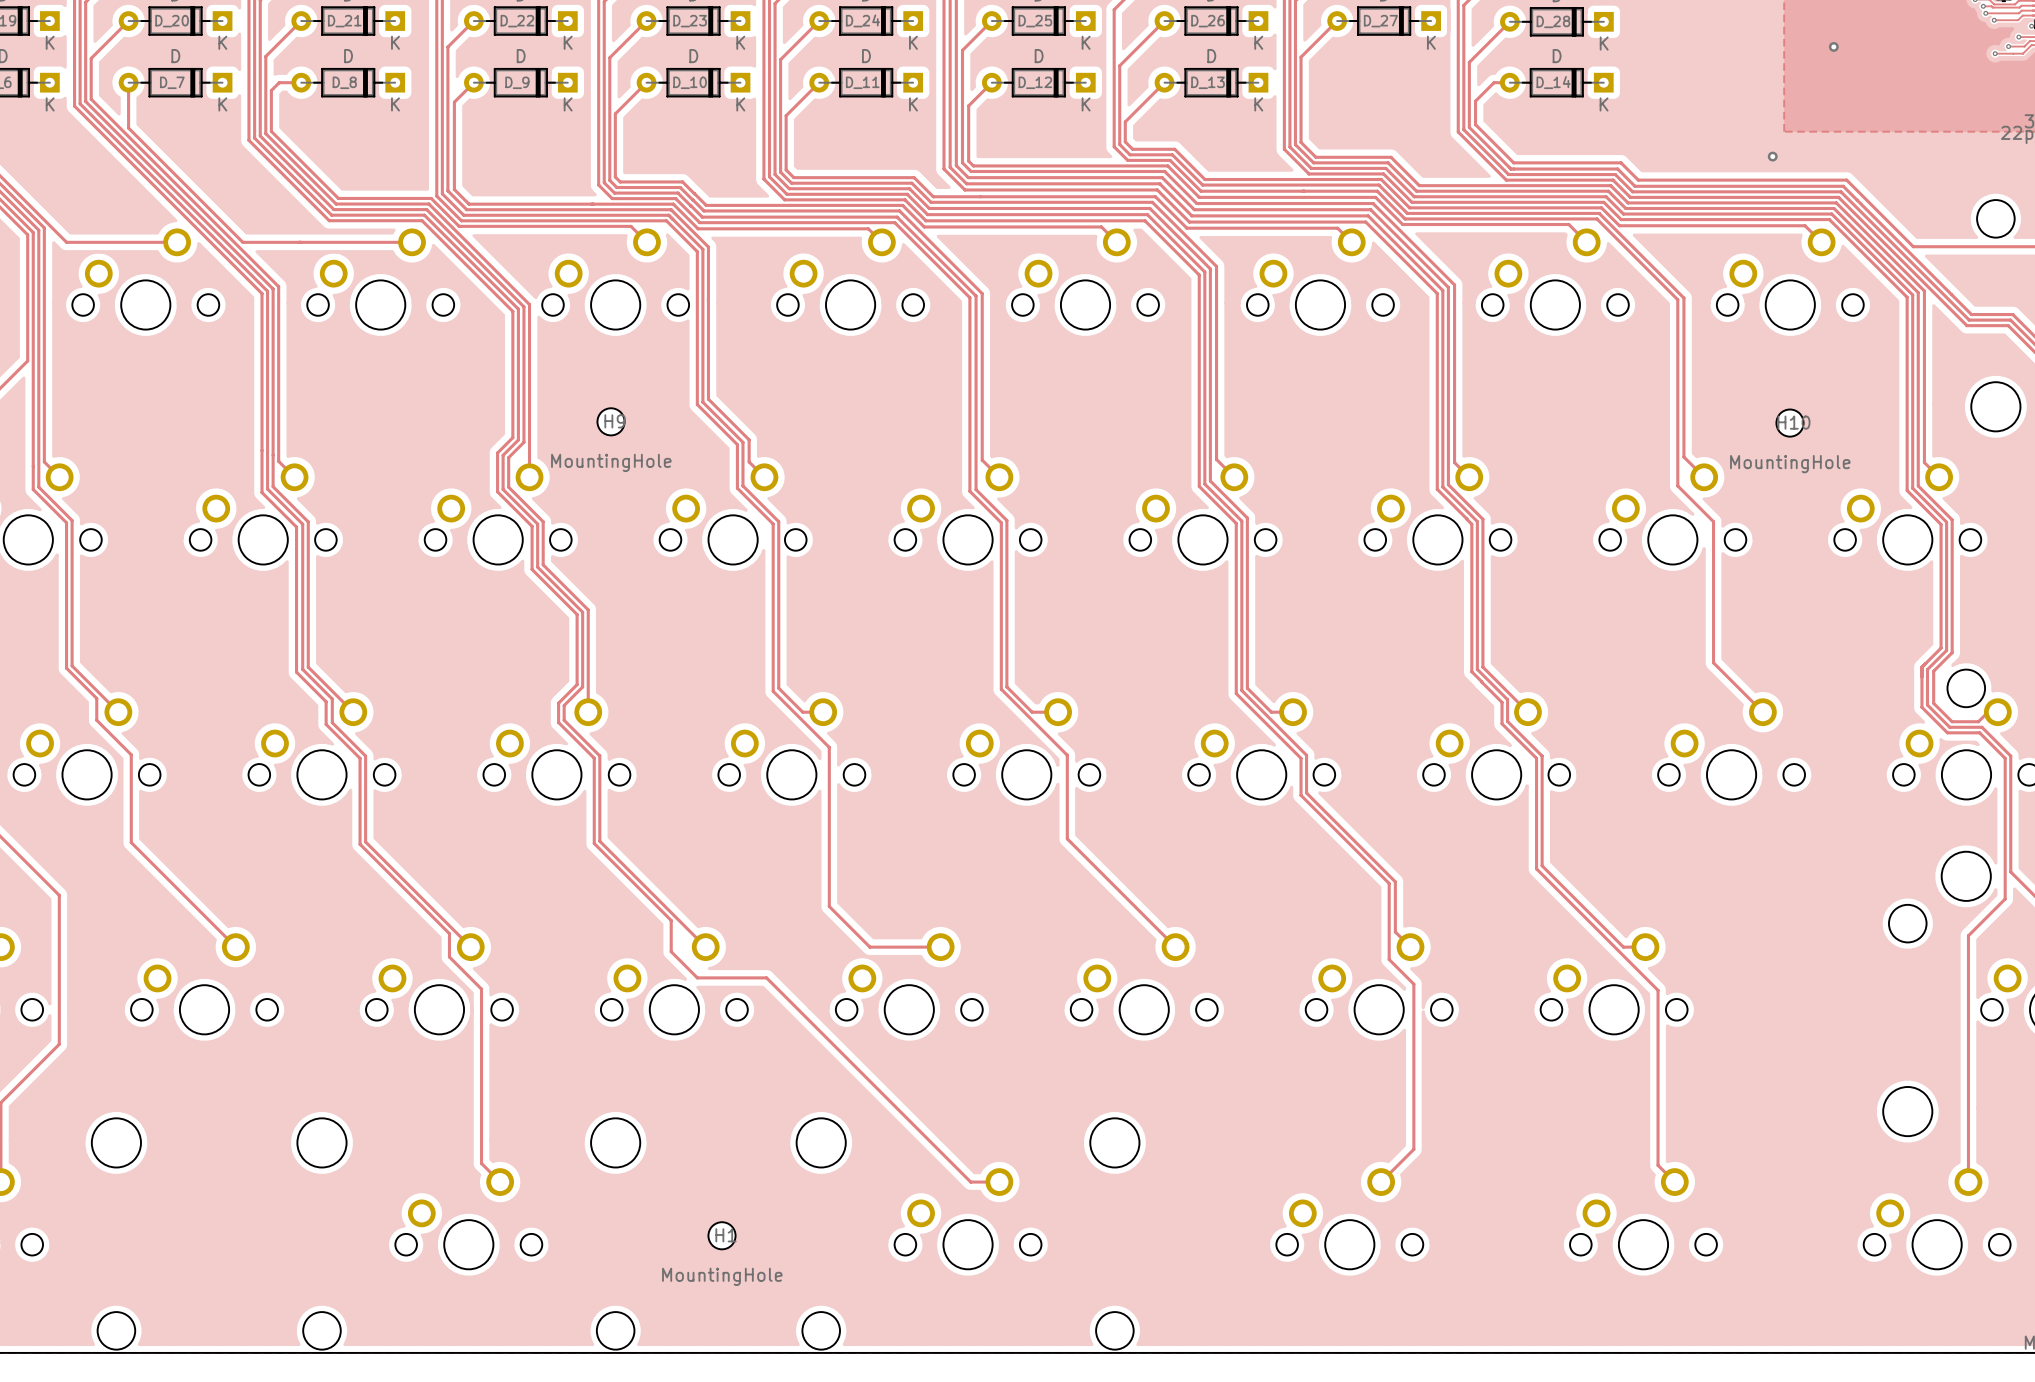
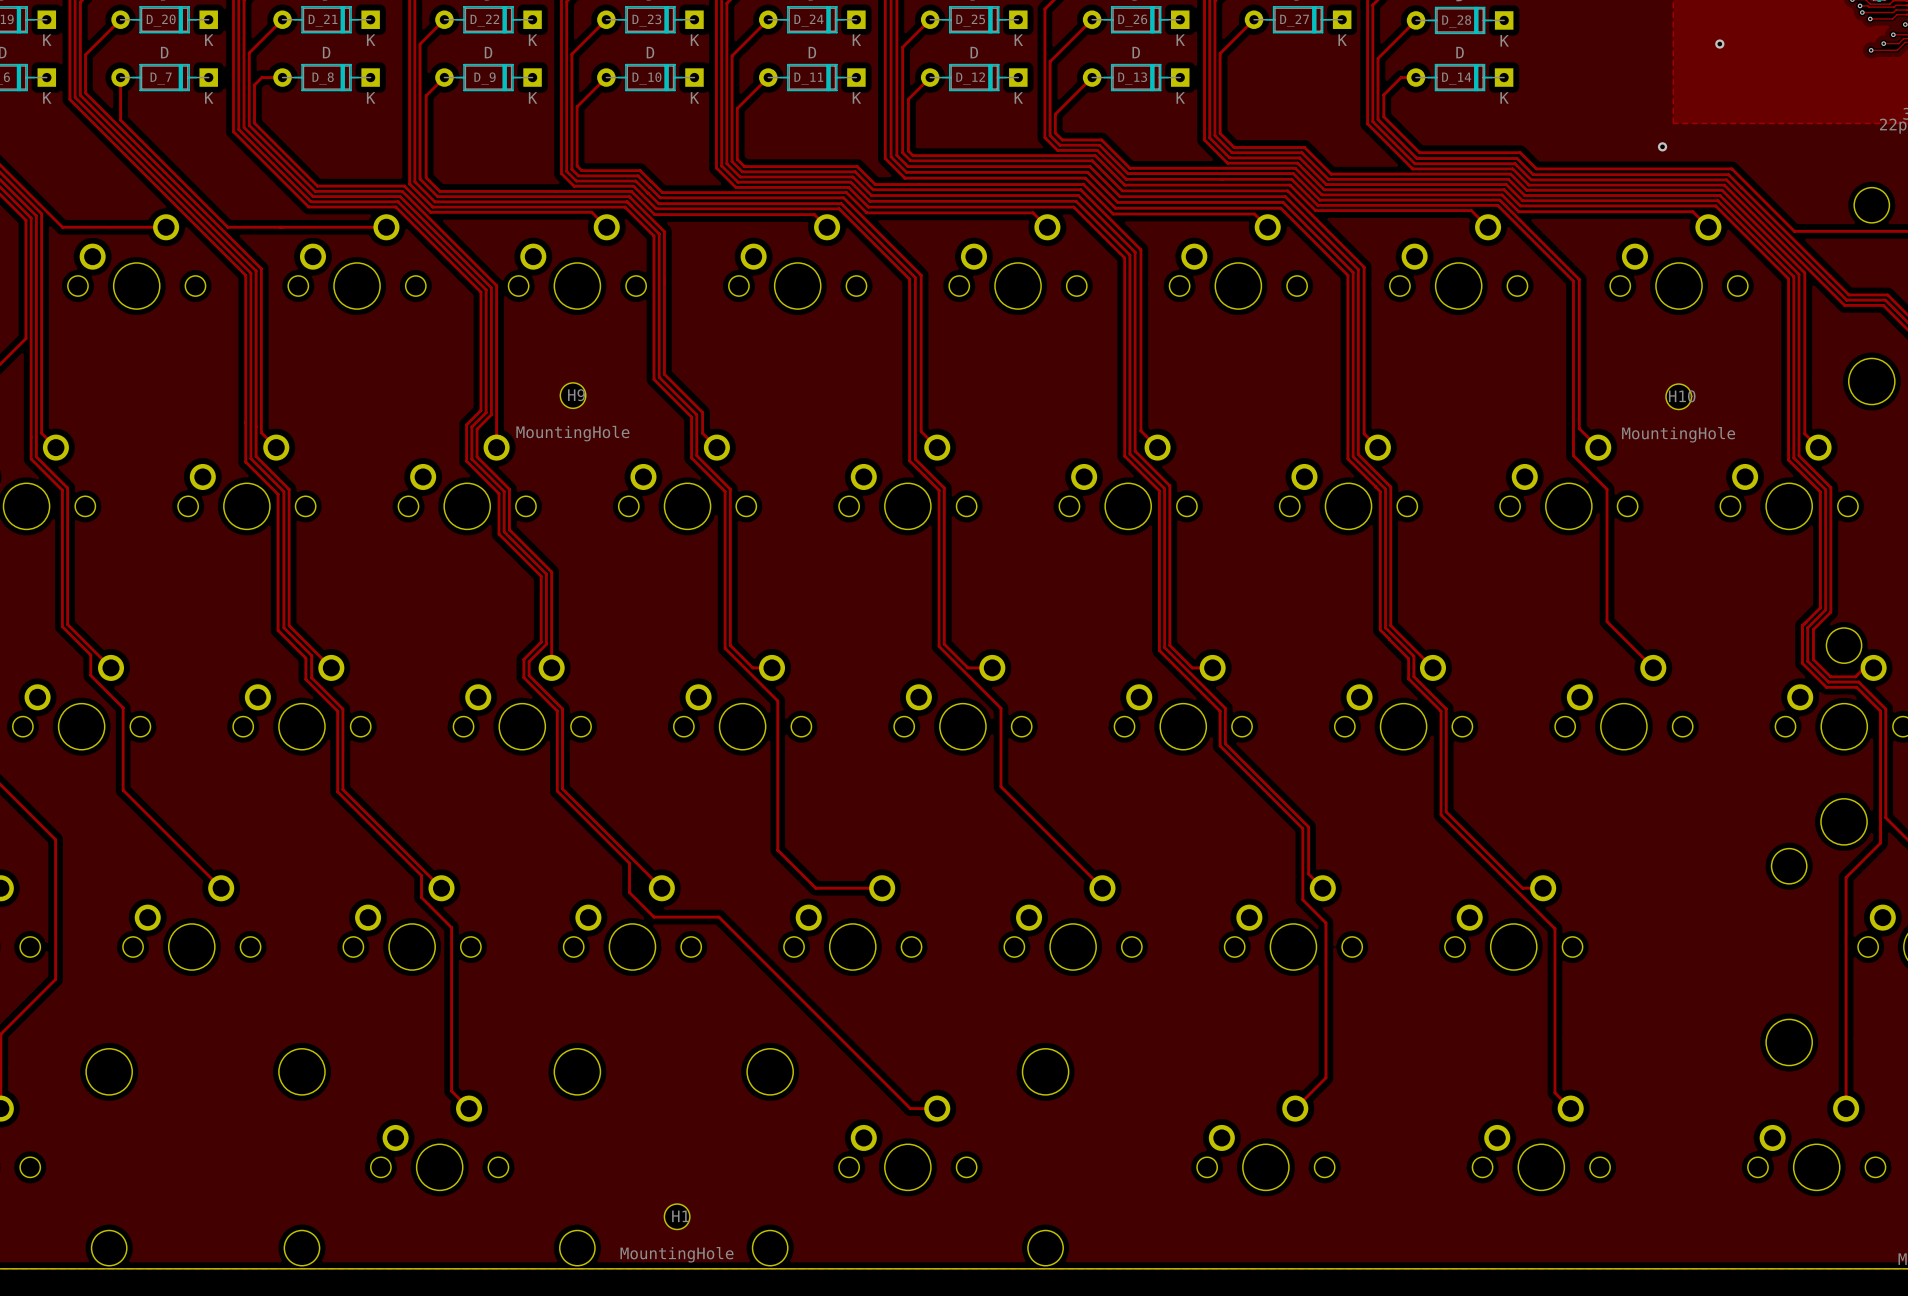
H1 position: (722, 1235) -> (677, 1216)

